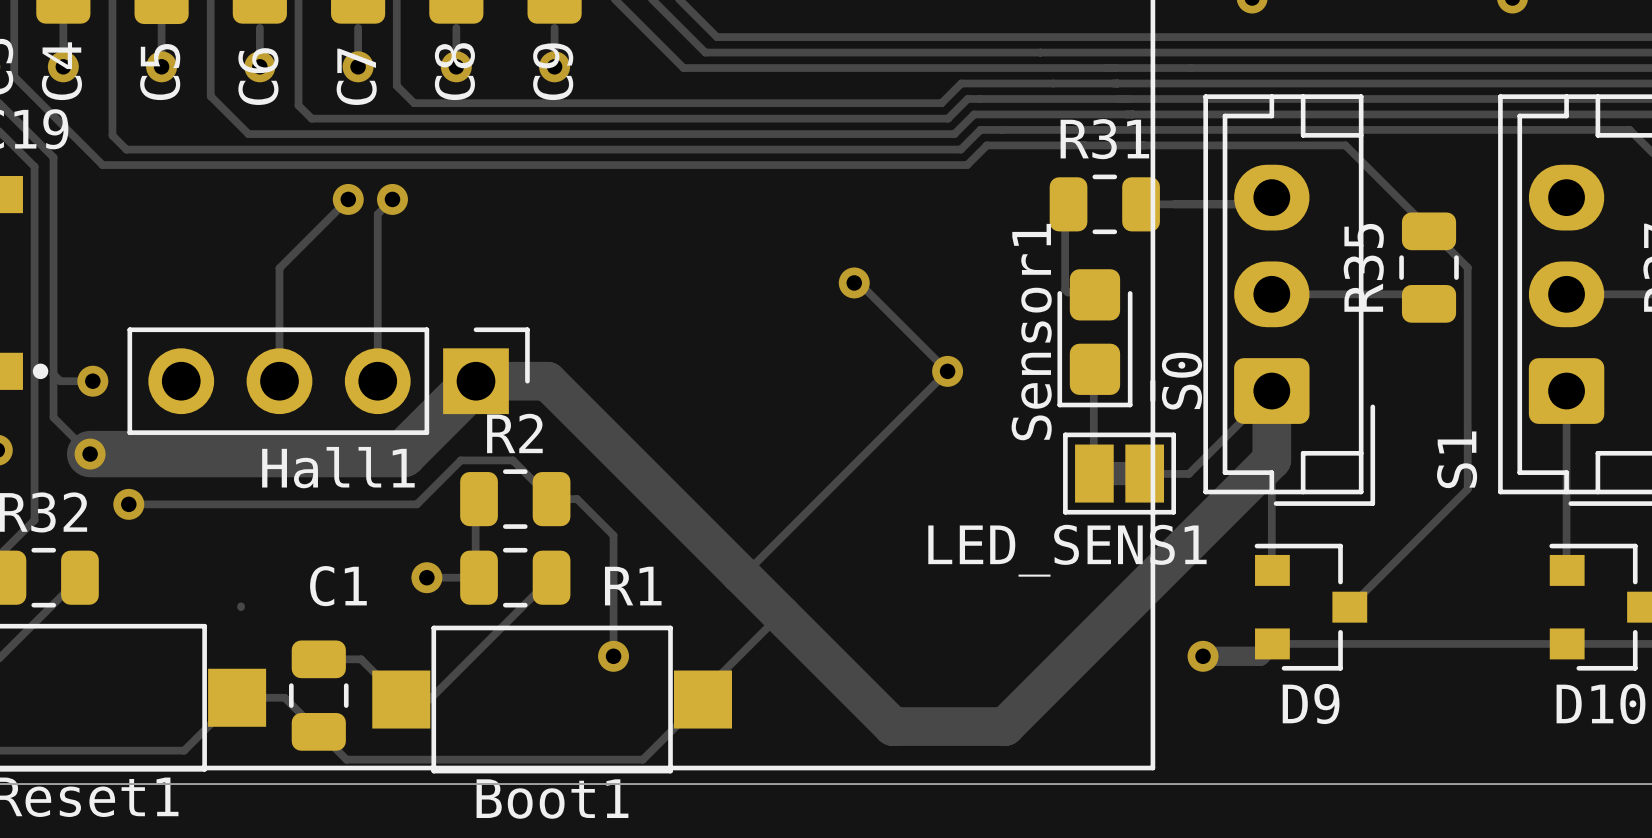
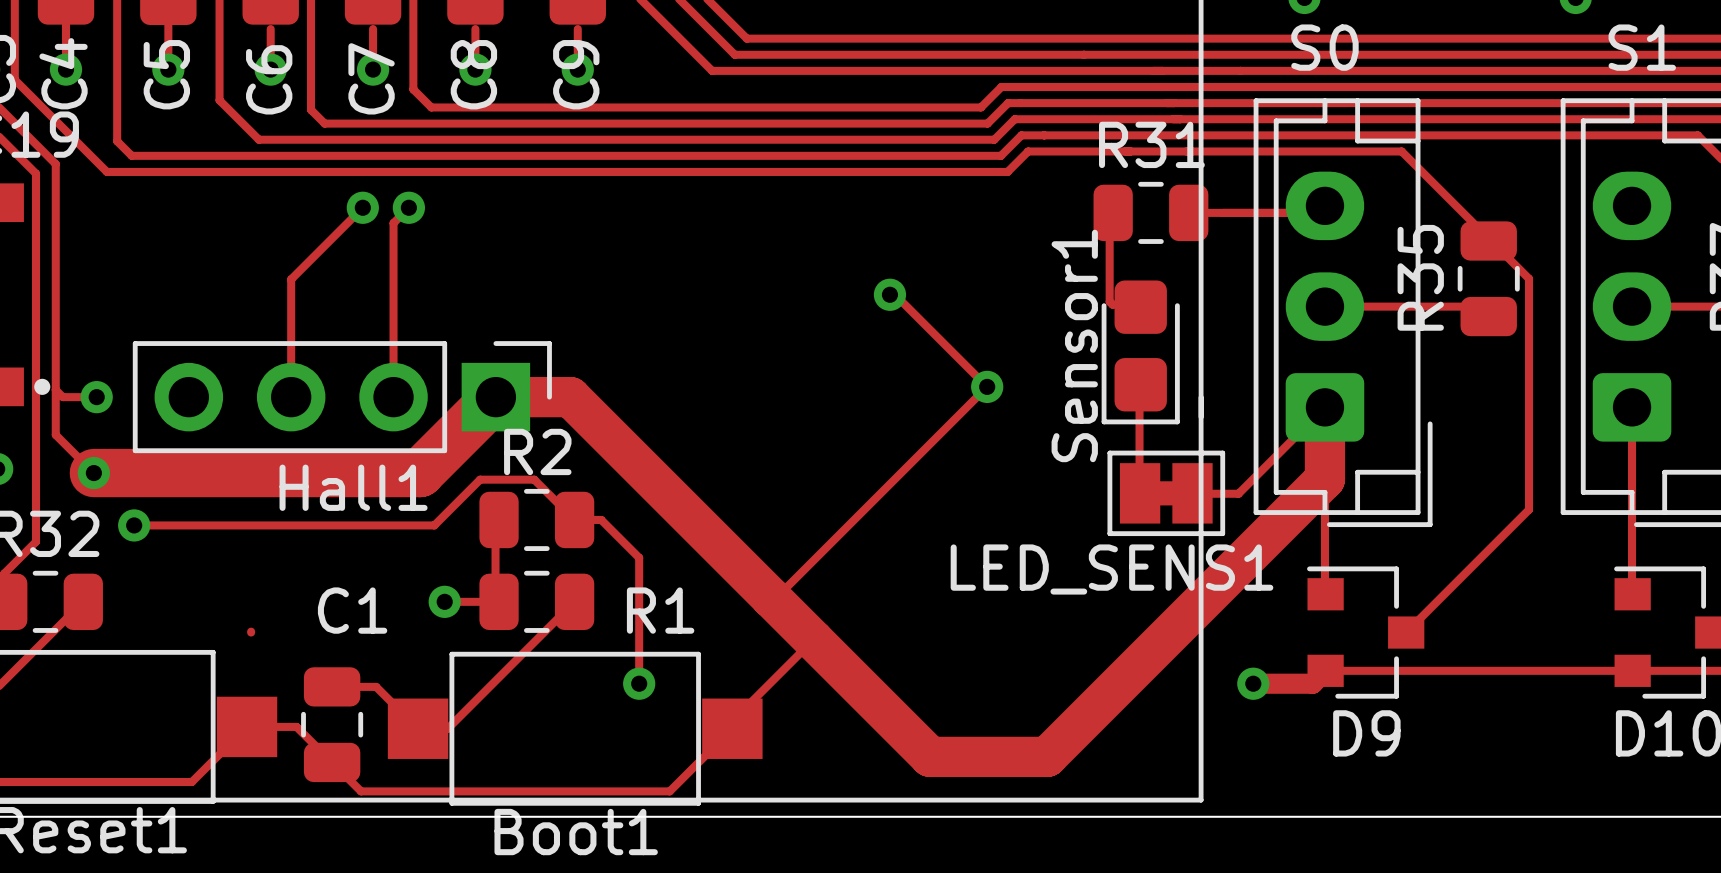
S0 name rotation: 0° (1181, 381) -> 90° clockwise (1324, 47)
S0 name position: S0 (1181, 381) -> S0 (1324, 47)
S1 name rotation: 0° (1457, 459) -> 90° clockwise (1642, 47)
S1 name position: S1 (1457, 459) -> S1 (1642, 47)

